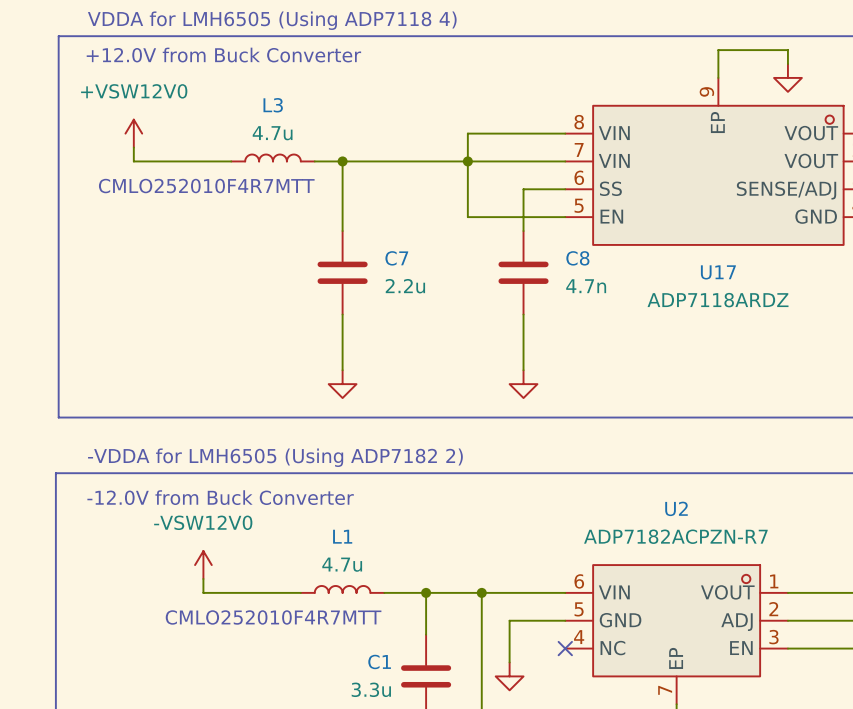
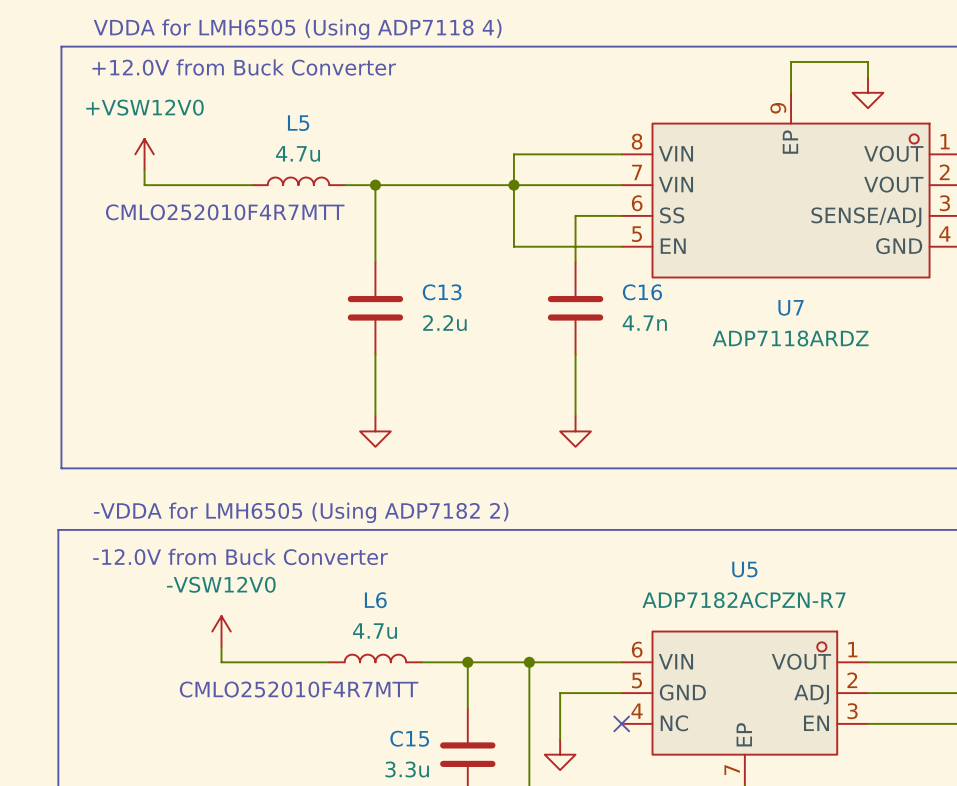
L3 name: L3 (273, 105) -> L5 (298, 123)
C7 name: C7 (396, 258) -> C13 (442, 292)
C8 name: C8 (577, 258) -> C16 (642, 292)
U17 name: U17 (718, 272) -> U7 (791, 307)
U2 name: U2 (676, 508) -> U5 (744, 569)
L1 name: L1 (342, 536) -> L6 (375, 600)
C1 name: C1 (379, 661) -> C15 (409, 738)

